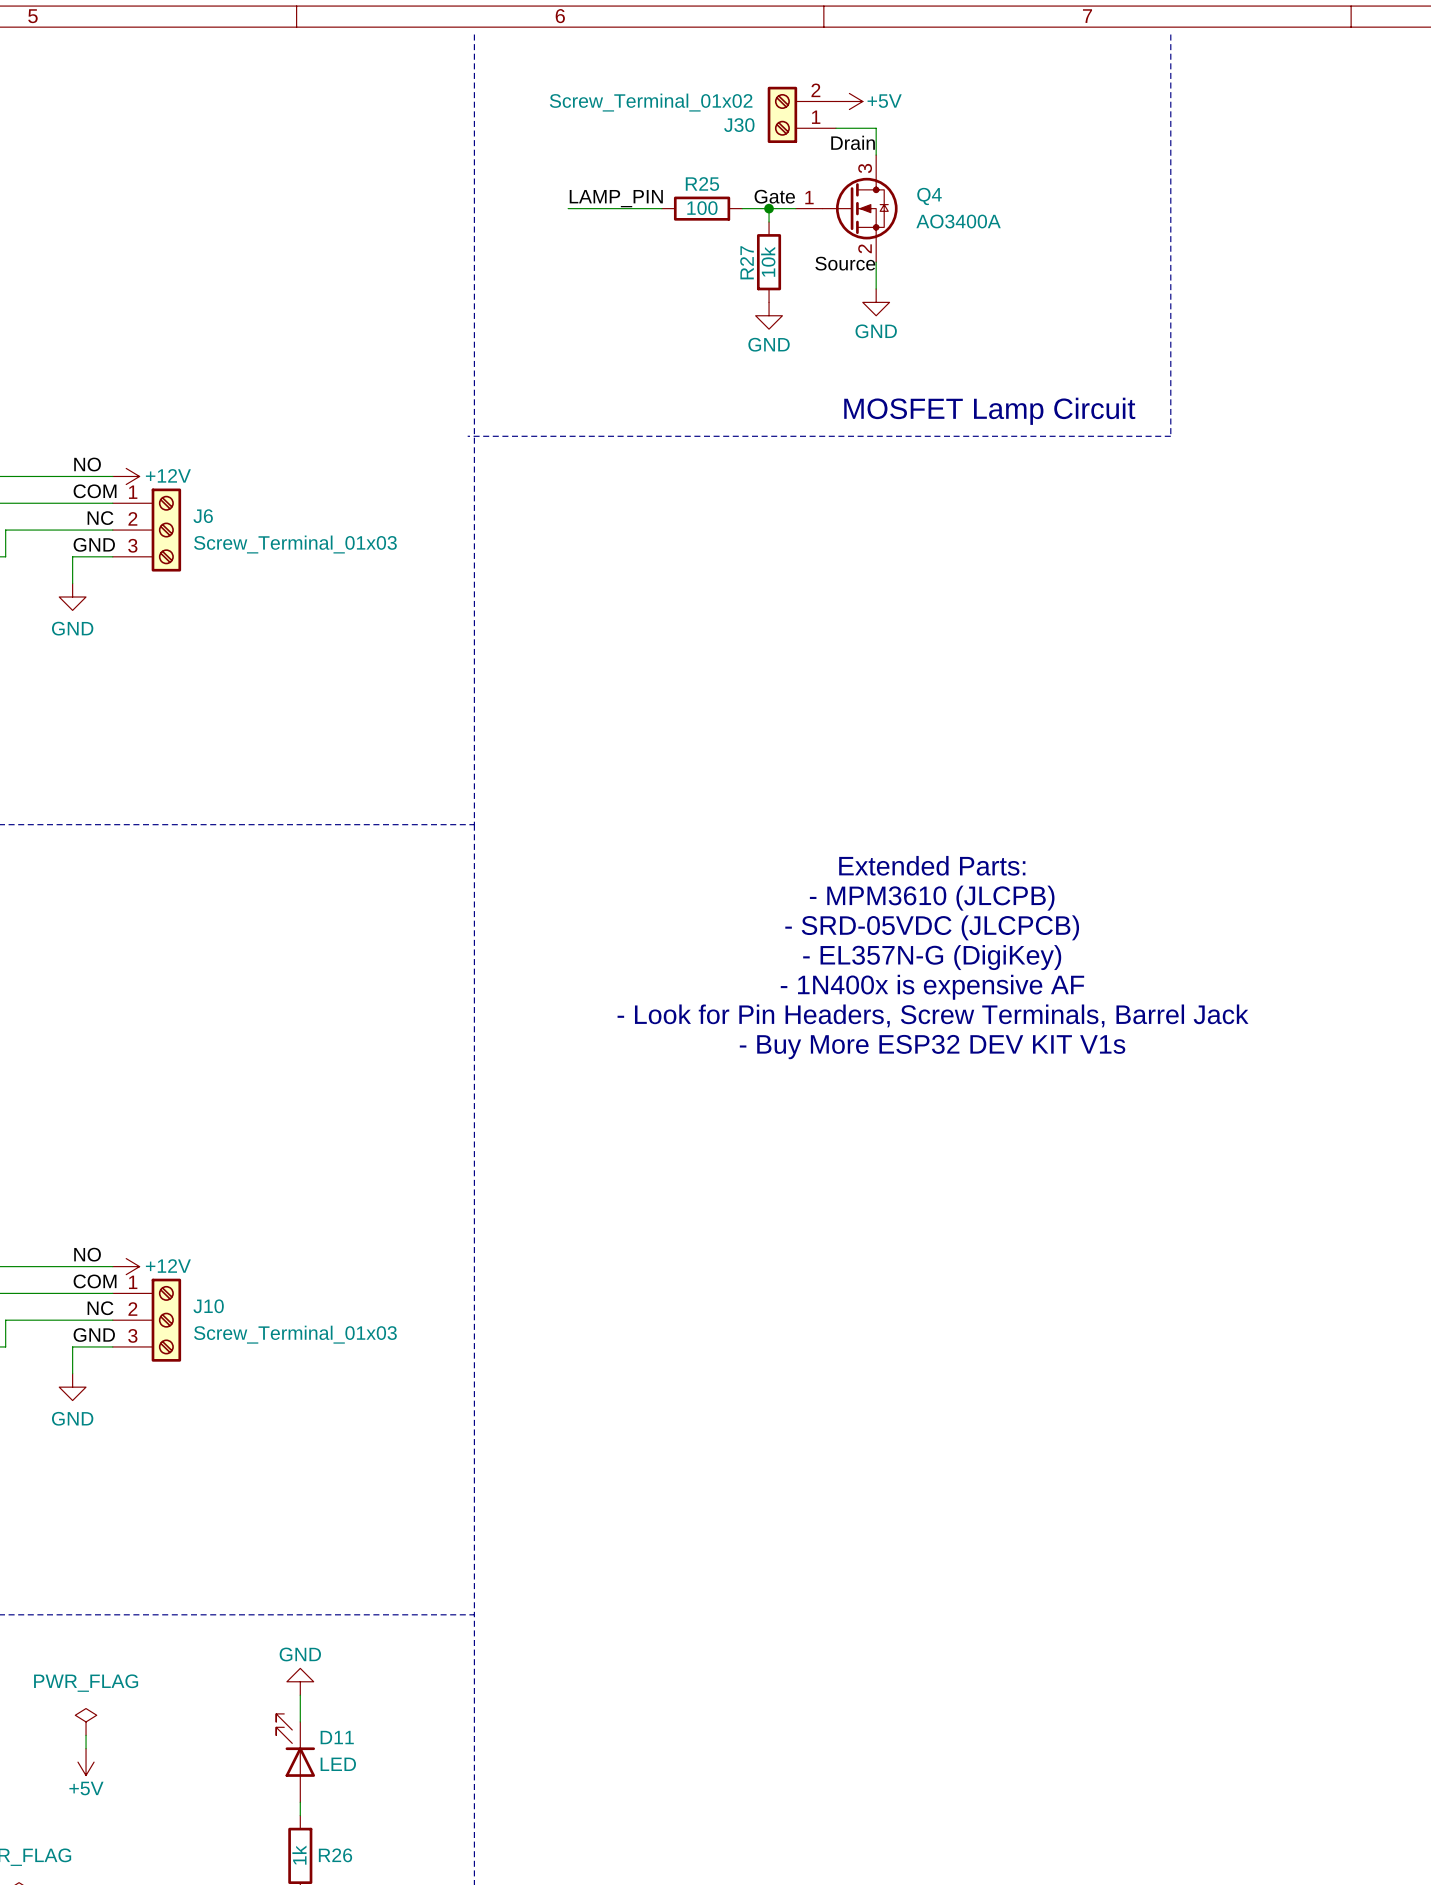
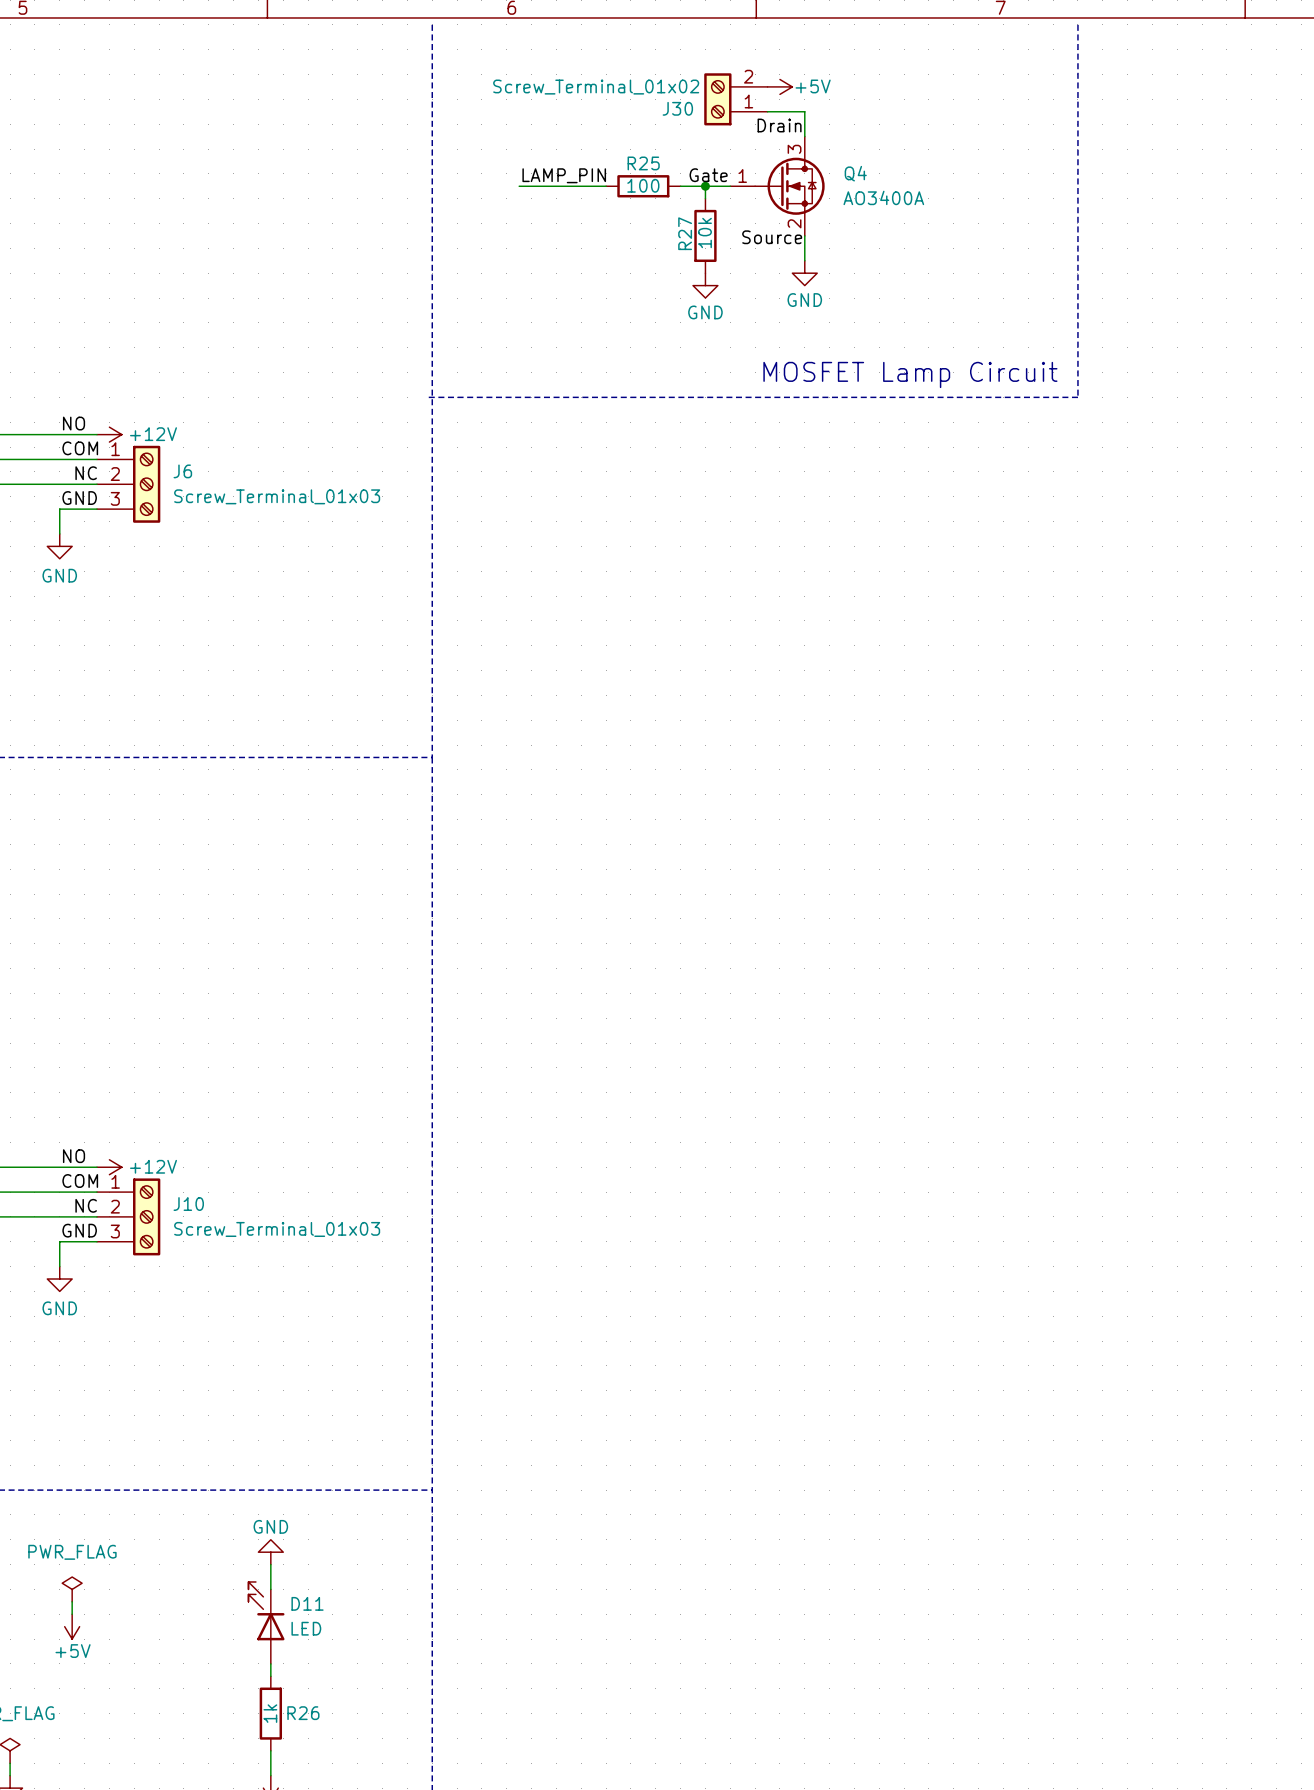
text: Extended Parts: (932, 865) -> none
text: - MPM3610 (JLCPB) (932, 898) -> none
text: - SRD-05VDC (JLCPCB) (932, 927) -> none
text: - EL357N-G (DigiKey) (932, 957) -> none
text: - 1N400x is expensive AF (932, 987) -> none
text: - Look for Pin Headers, Screw Terminals, Barrel Jack (933, 1015) -> none
text: - Buy More ESP32 DEV KIT V1s (932, 1047) -> none

